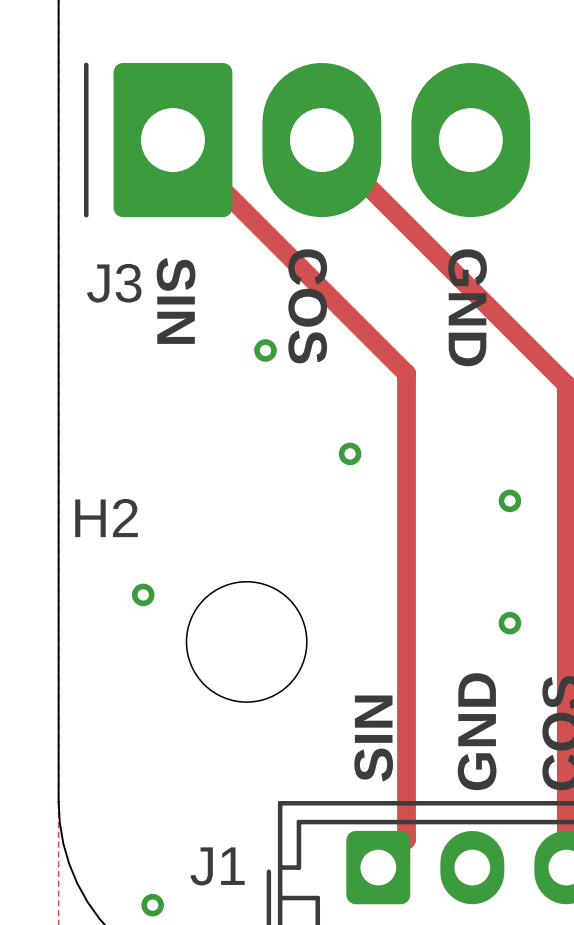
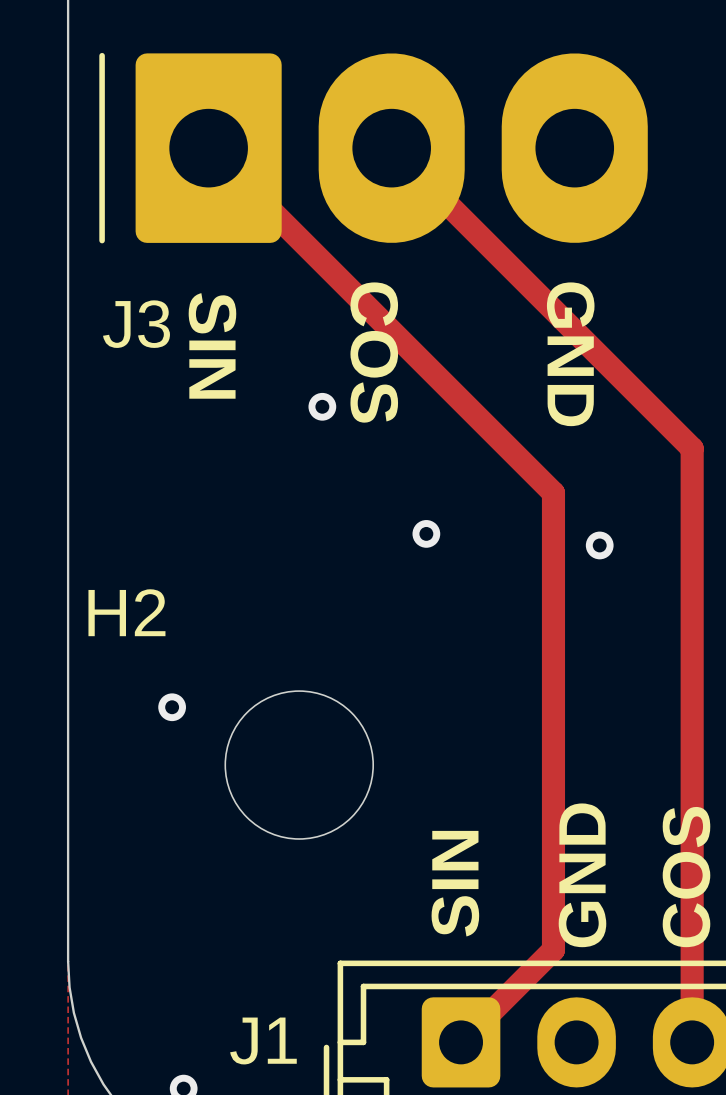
track: (406, 373) (406, 839) -> (495, 435) (553, 492) (553, 949) (495, 1007)
via position: (509, 500) -> (599, 545)
via: (509, 623) -> none

